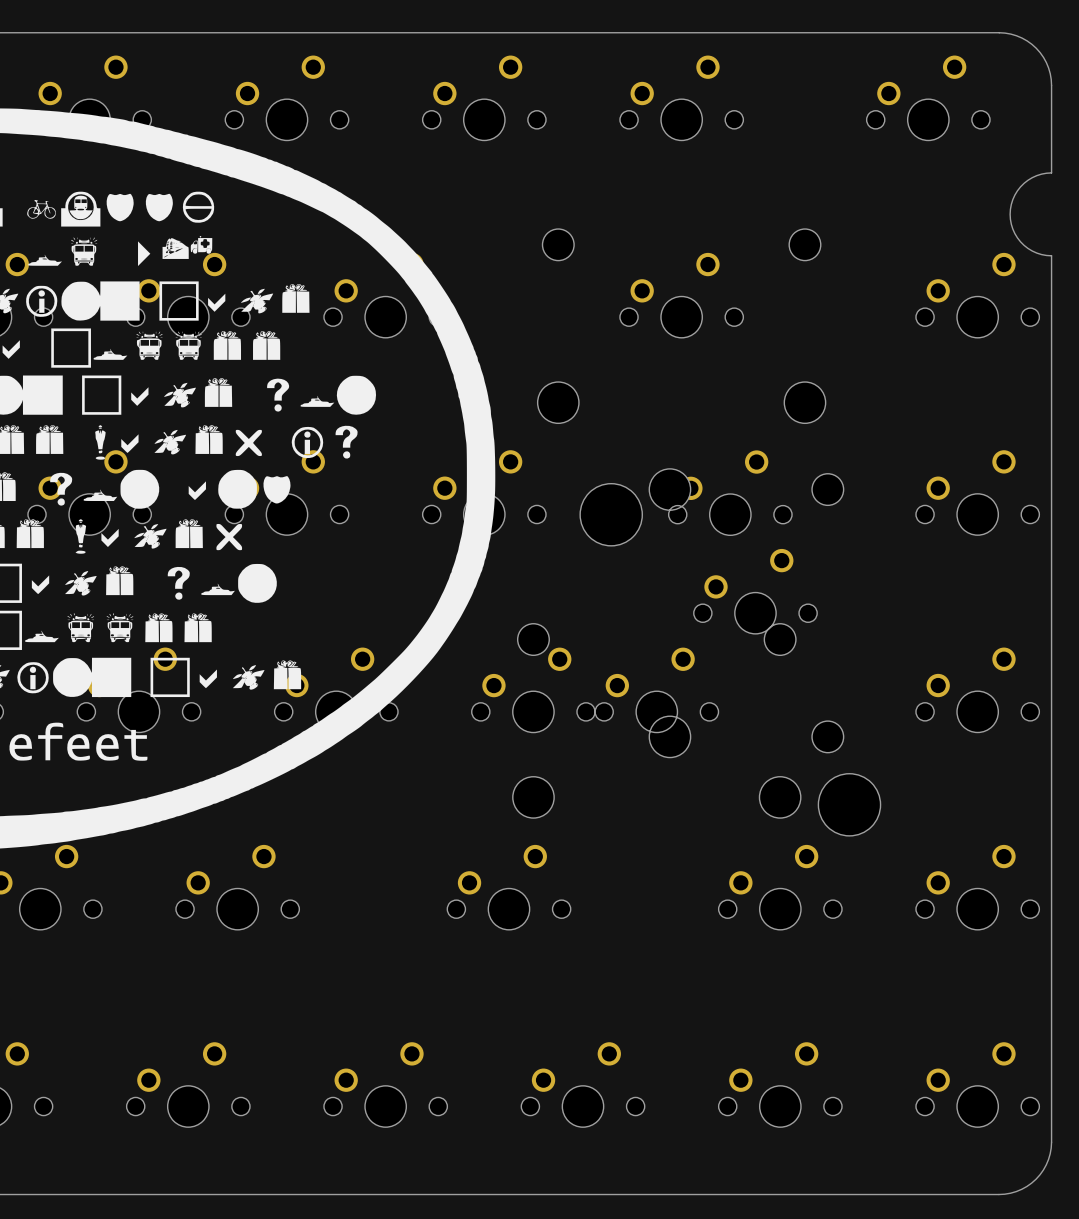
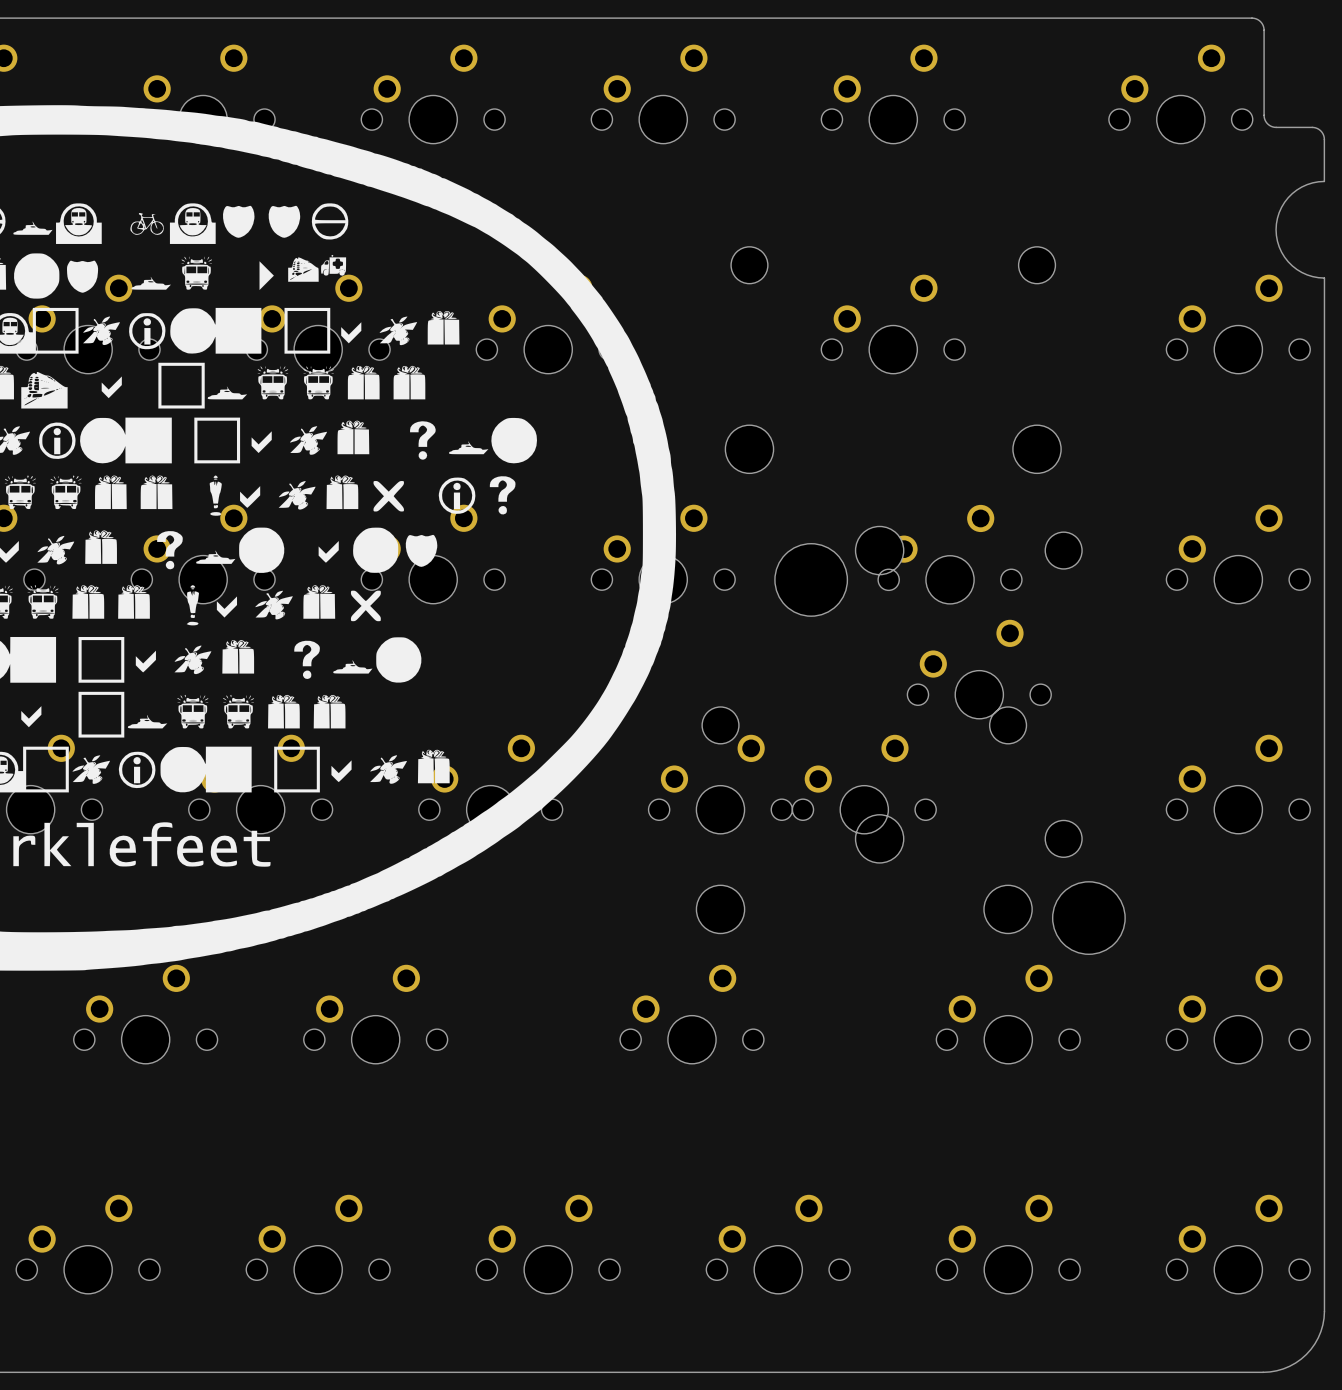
board edge: (989, 32) (1010, 34) (1027, 40) (1040, 52) (1050, 73) (1051, 172) (1032, 177) (1020, 186) (1012, 199) (1010, 214) (1012, 229) (1020, 241) (1032, 251) (1051, 255) -> (1252, 18) (1260, 21) (1263, 28) (1264, 115) (1265, 121) (1274, 127) (1315, 127) (1320, 130) (1323, 136) (1324, 181) (1307, 184) (1292, 193) (1279, 212) (1276, 229) (1279, 246) (1292, 265) (1307, 274) (1324, 278)

